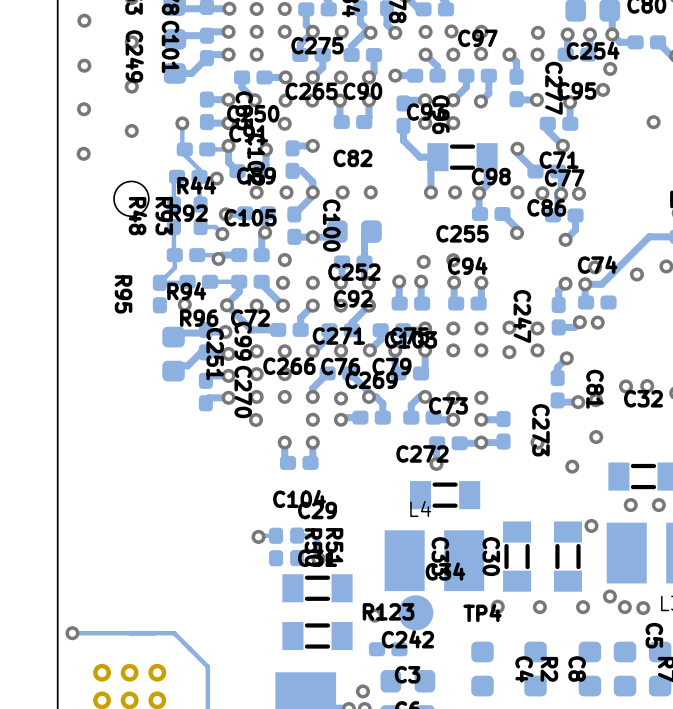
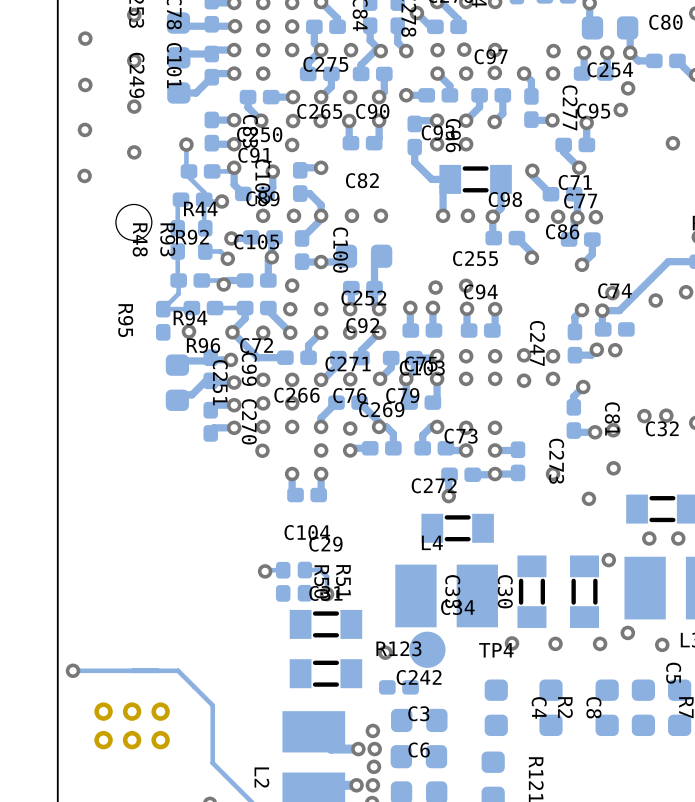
via: (624, 607) -> none

